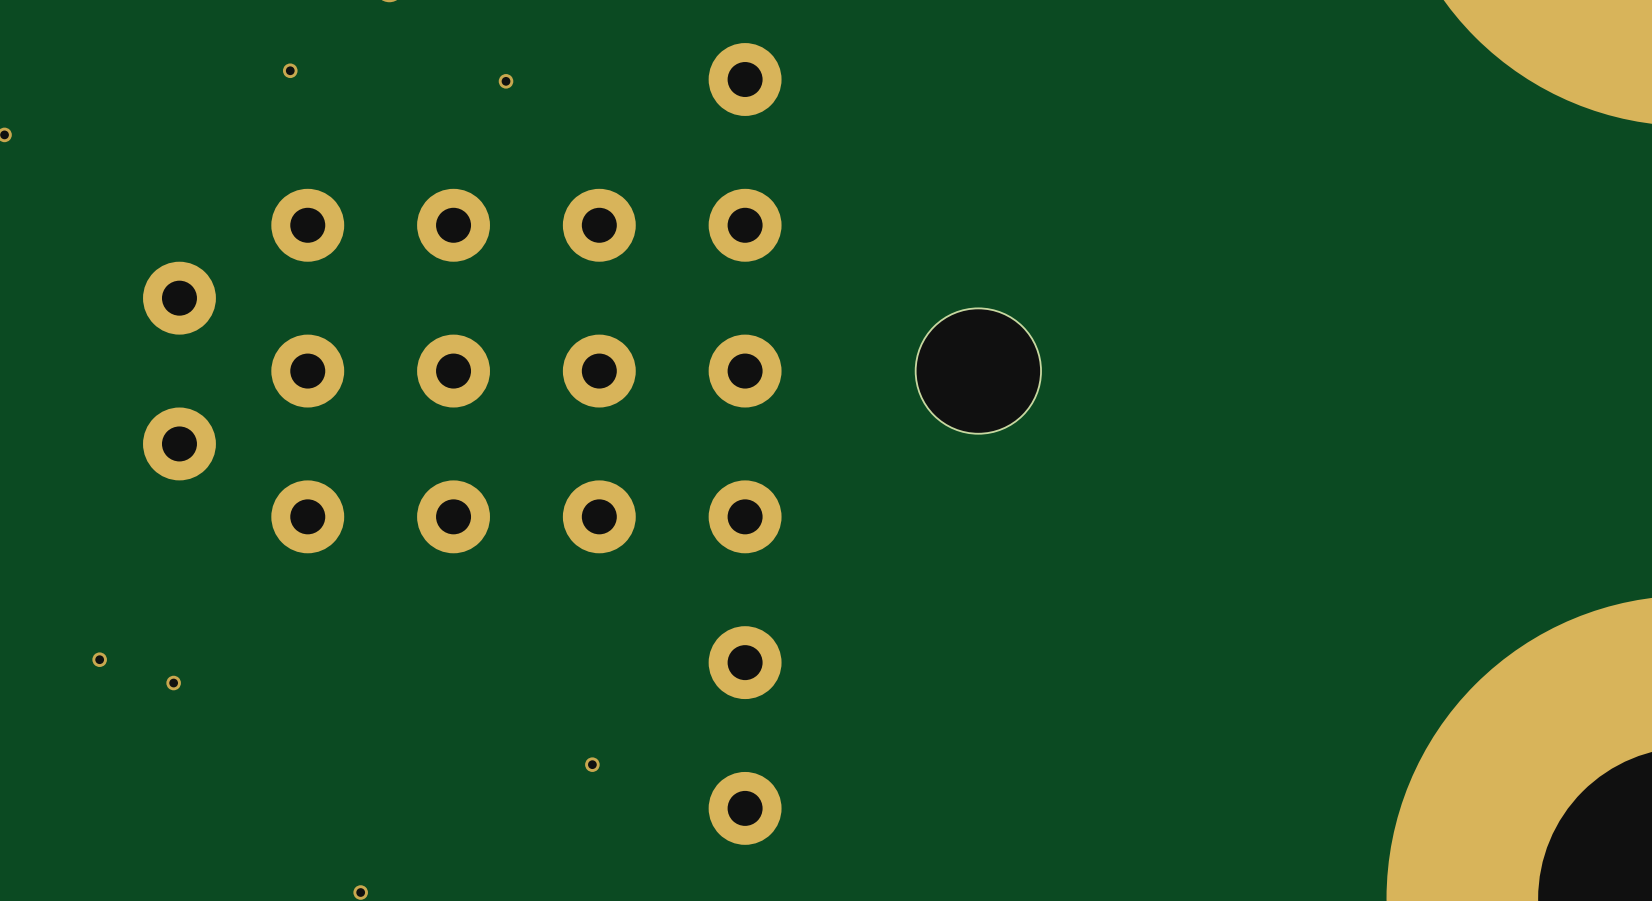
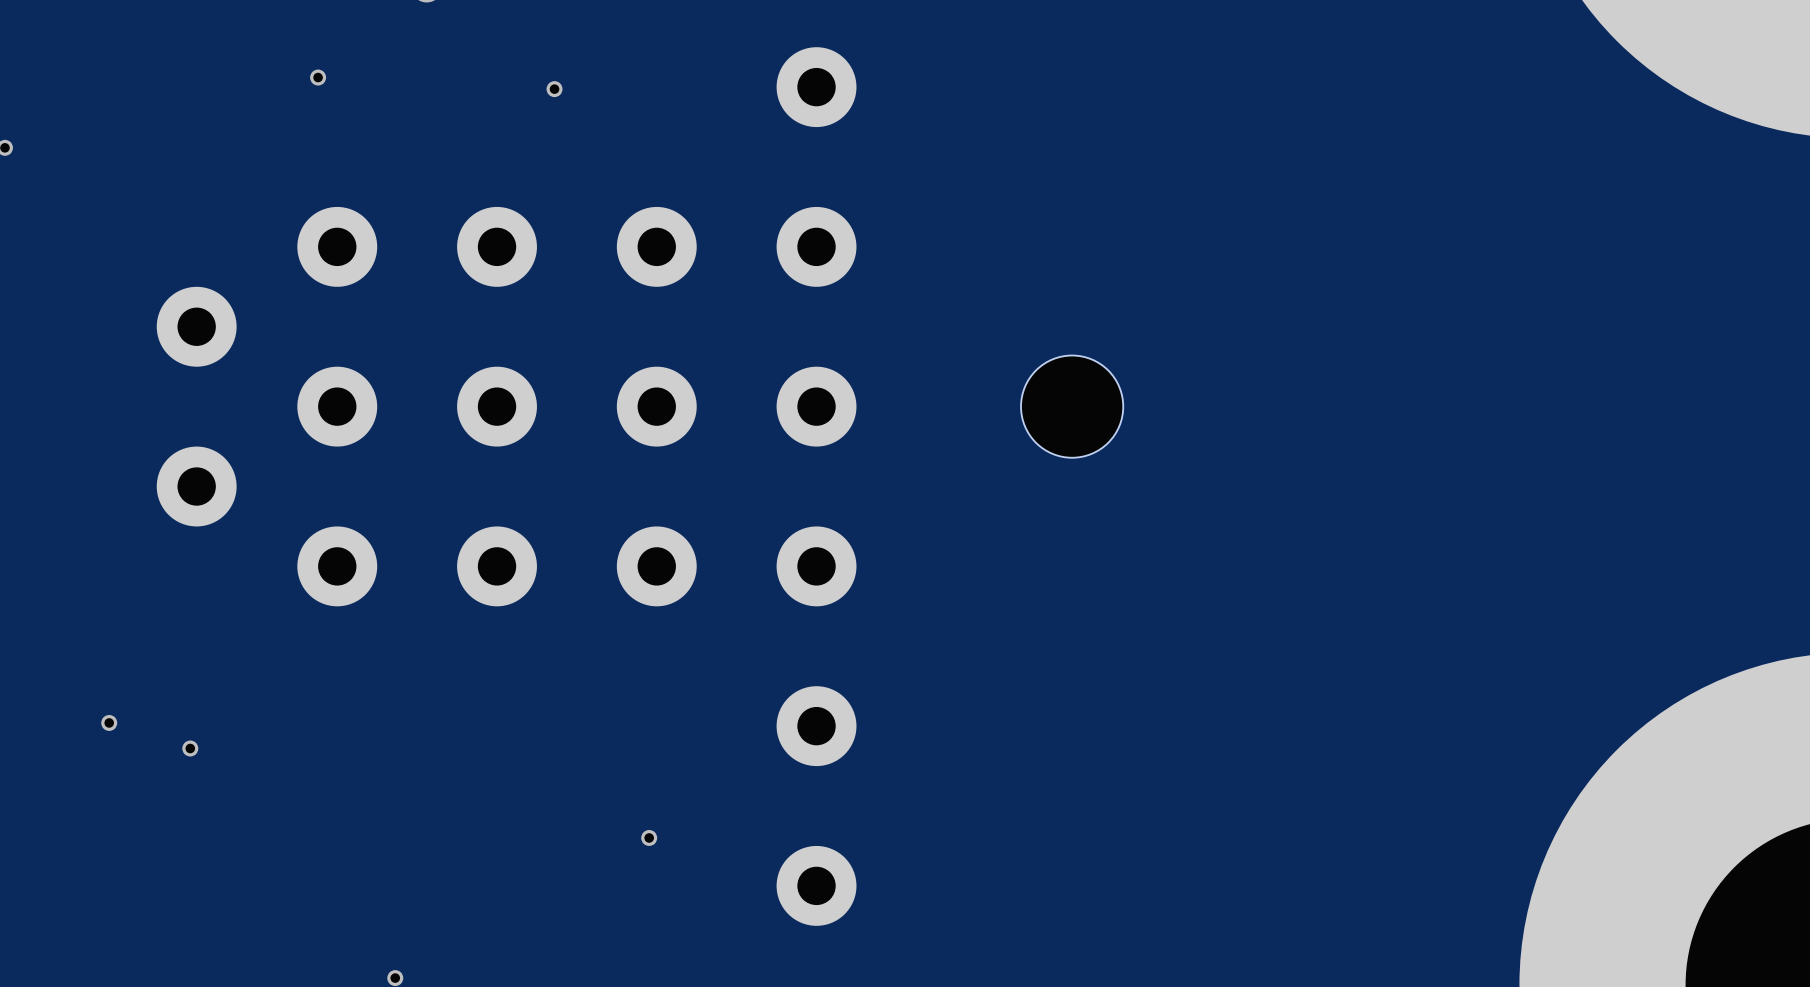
part footprint: [915, 308, 1042, 434] -> [1021, 355, 1124, 458]

